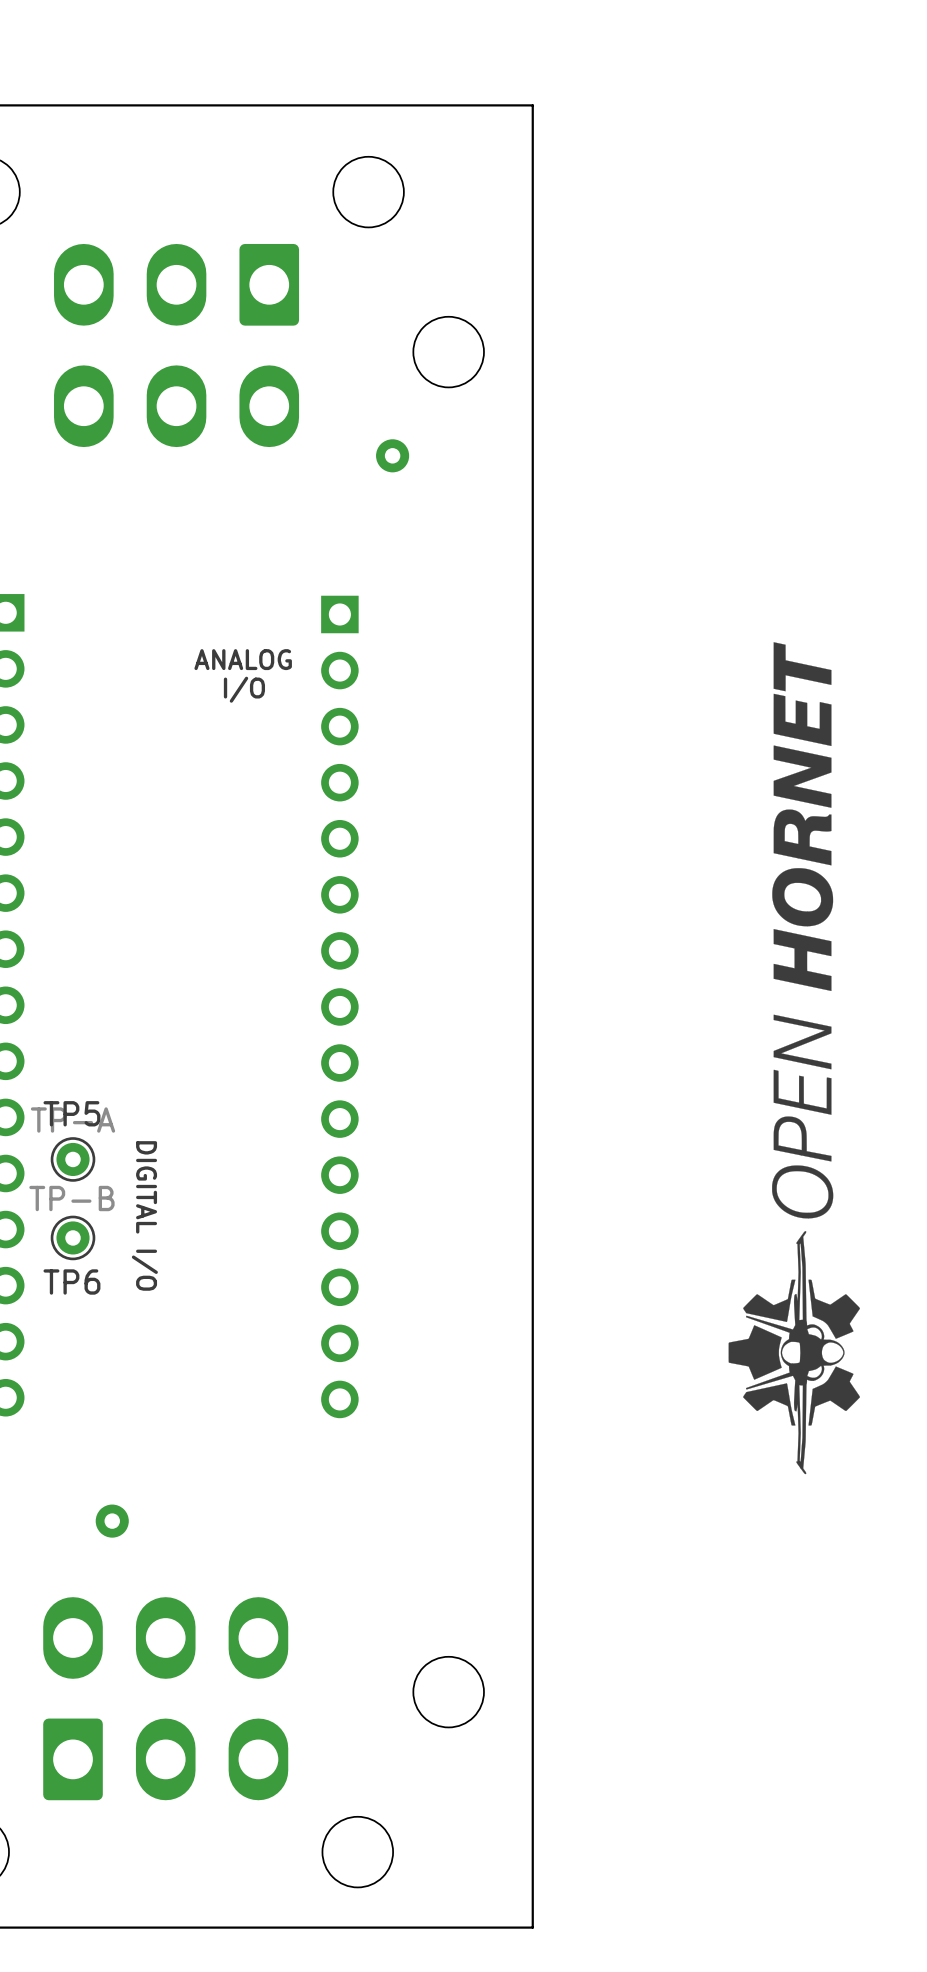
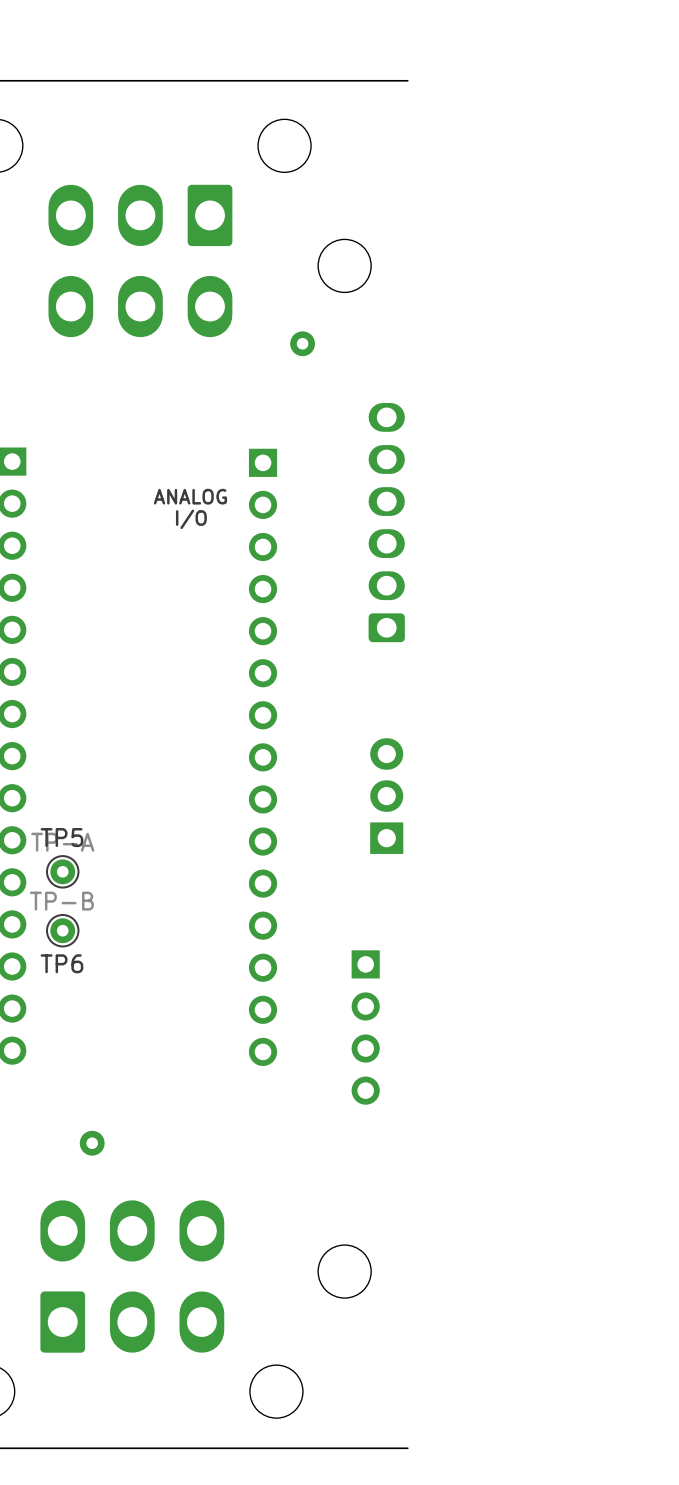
board edge: (532, 105) (532, 1927) -> none
drawing: [728, 642, 860, 1475] -> none
part: none -> (386, 522)
part: none -> (386, 796)
text: DIGITAL I/O (144, 1215) -> none
part: none -> (365, 1027)

